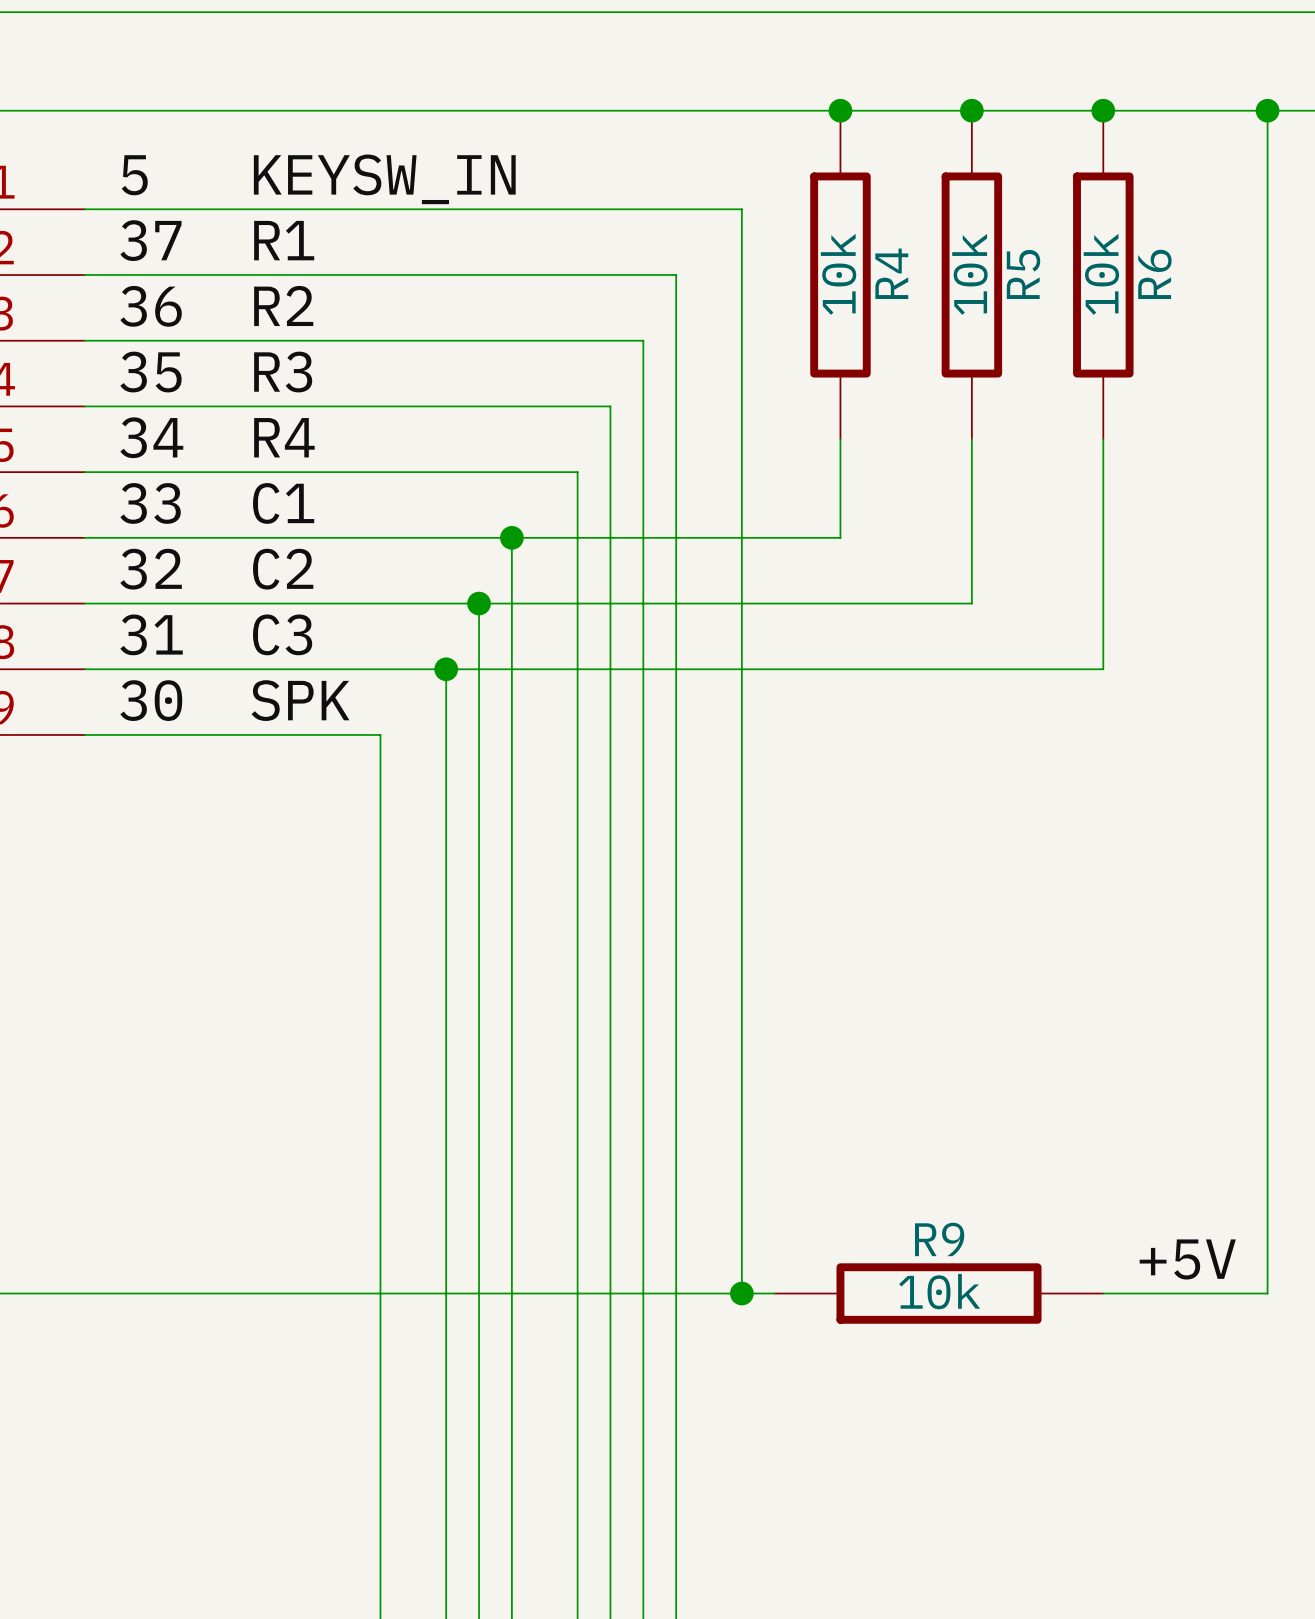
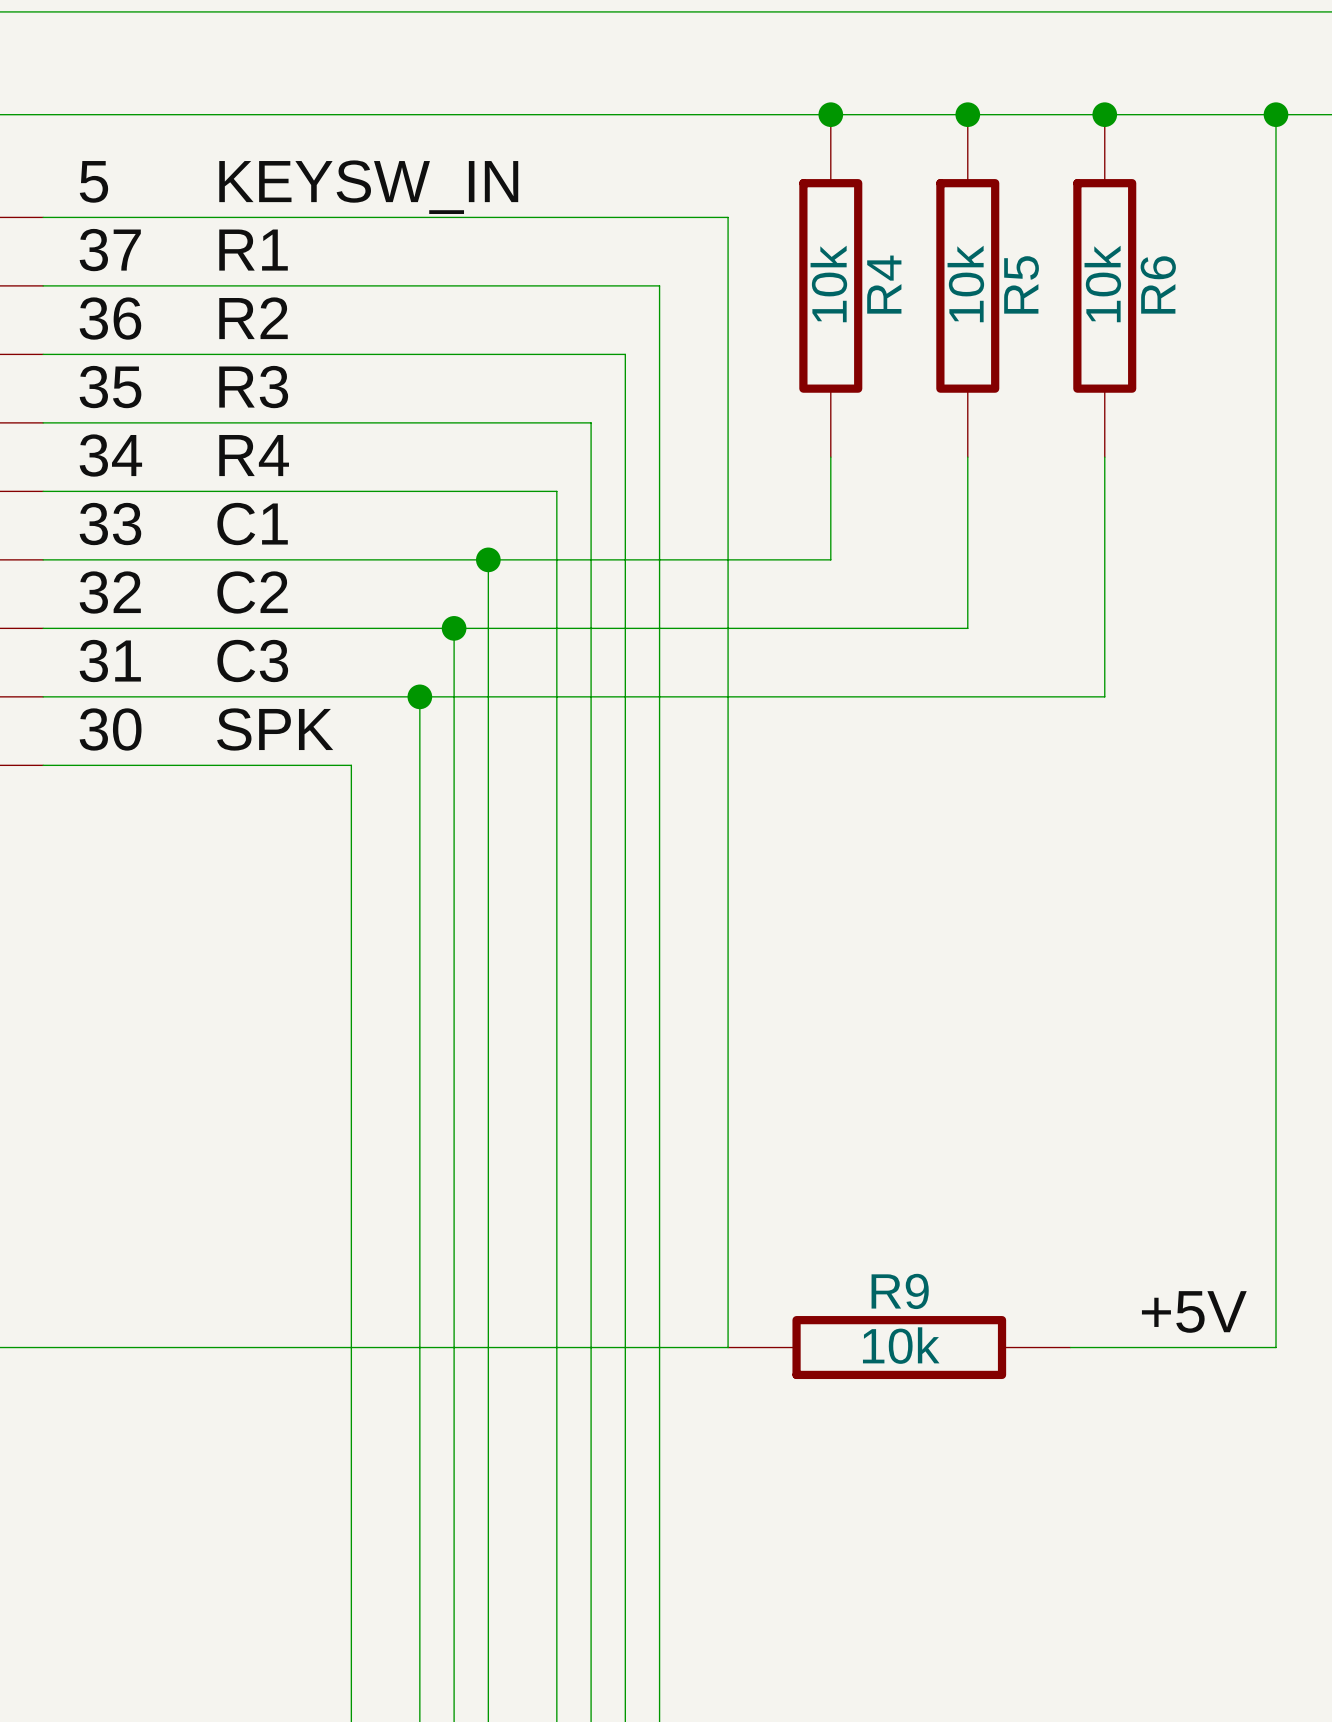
junction: (741, 1293) -> none
R9 position: (939, 1293) -> (899, 1347)

